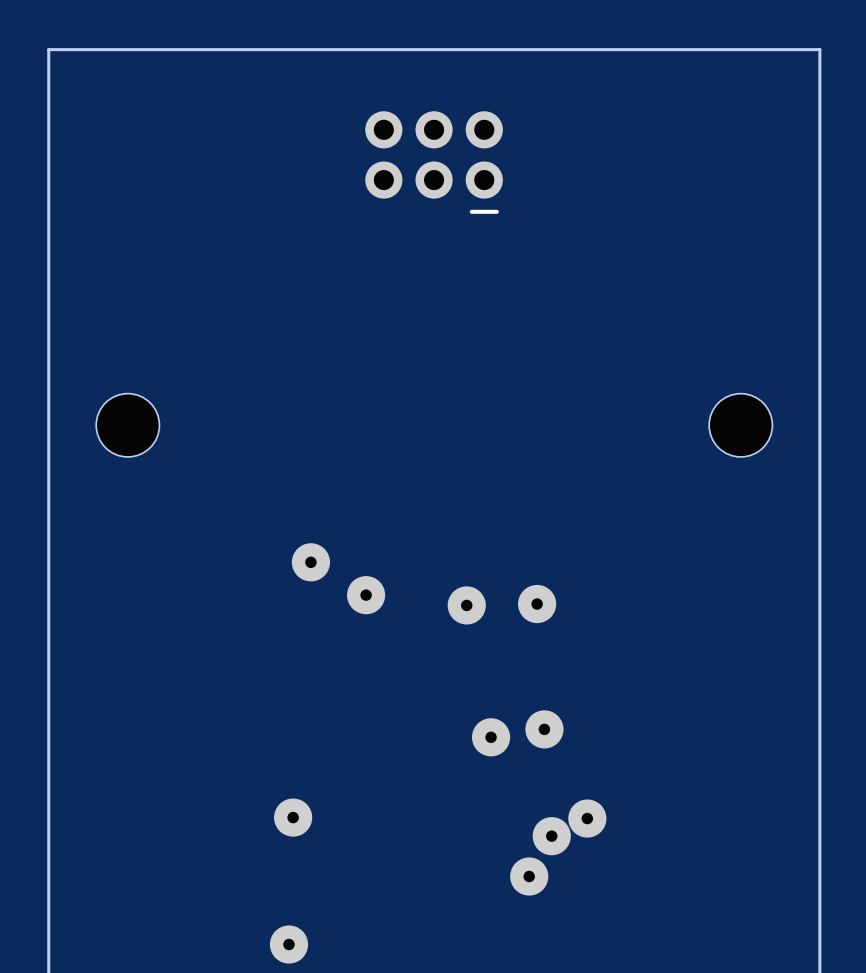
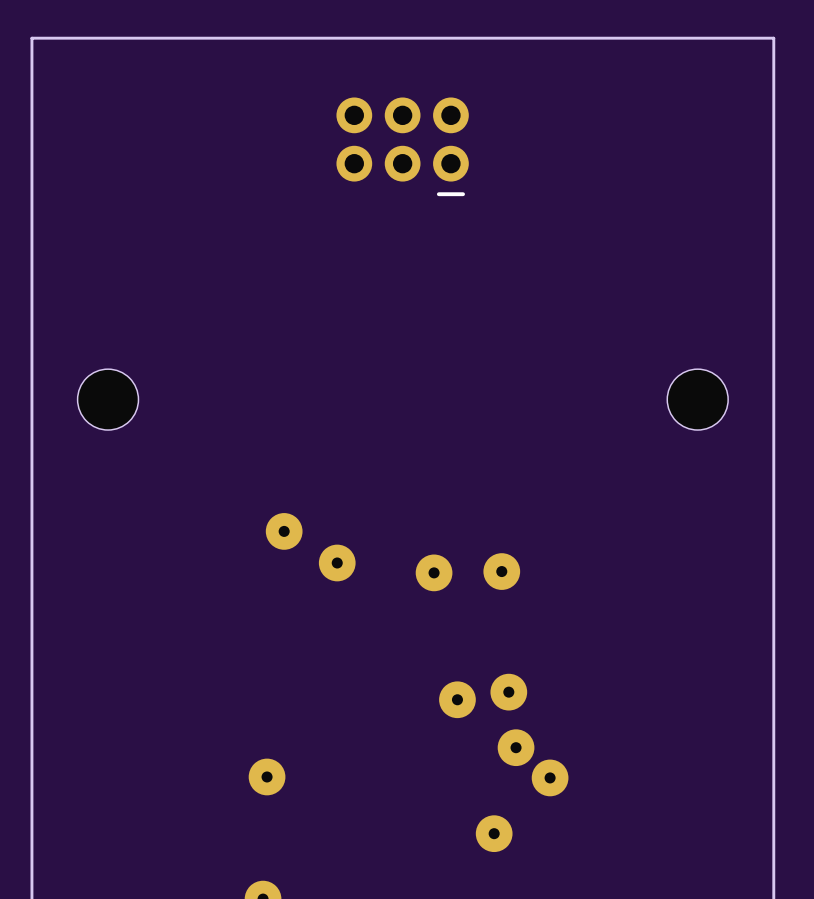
part position: (551, 836) -> (516, 747)

